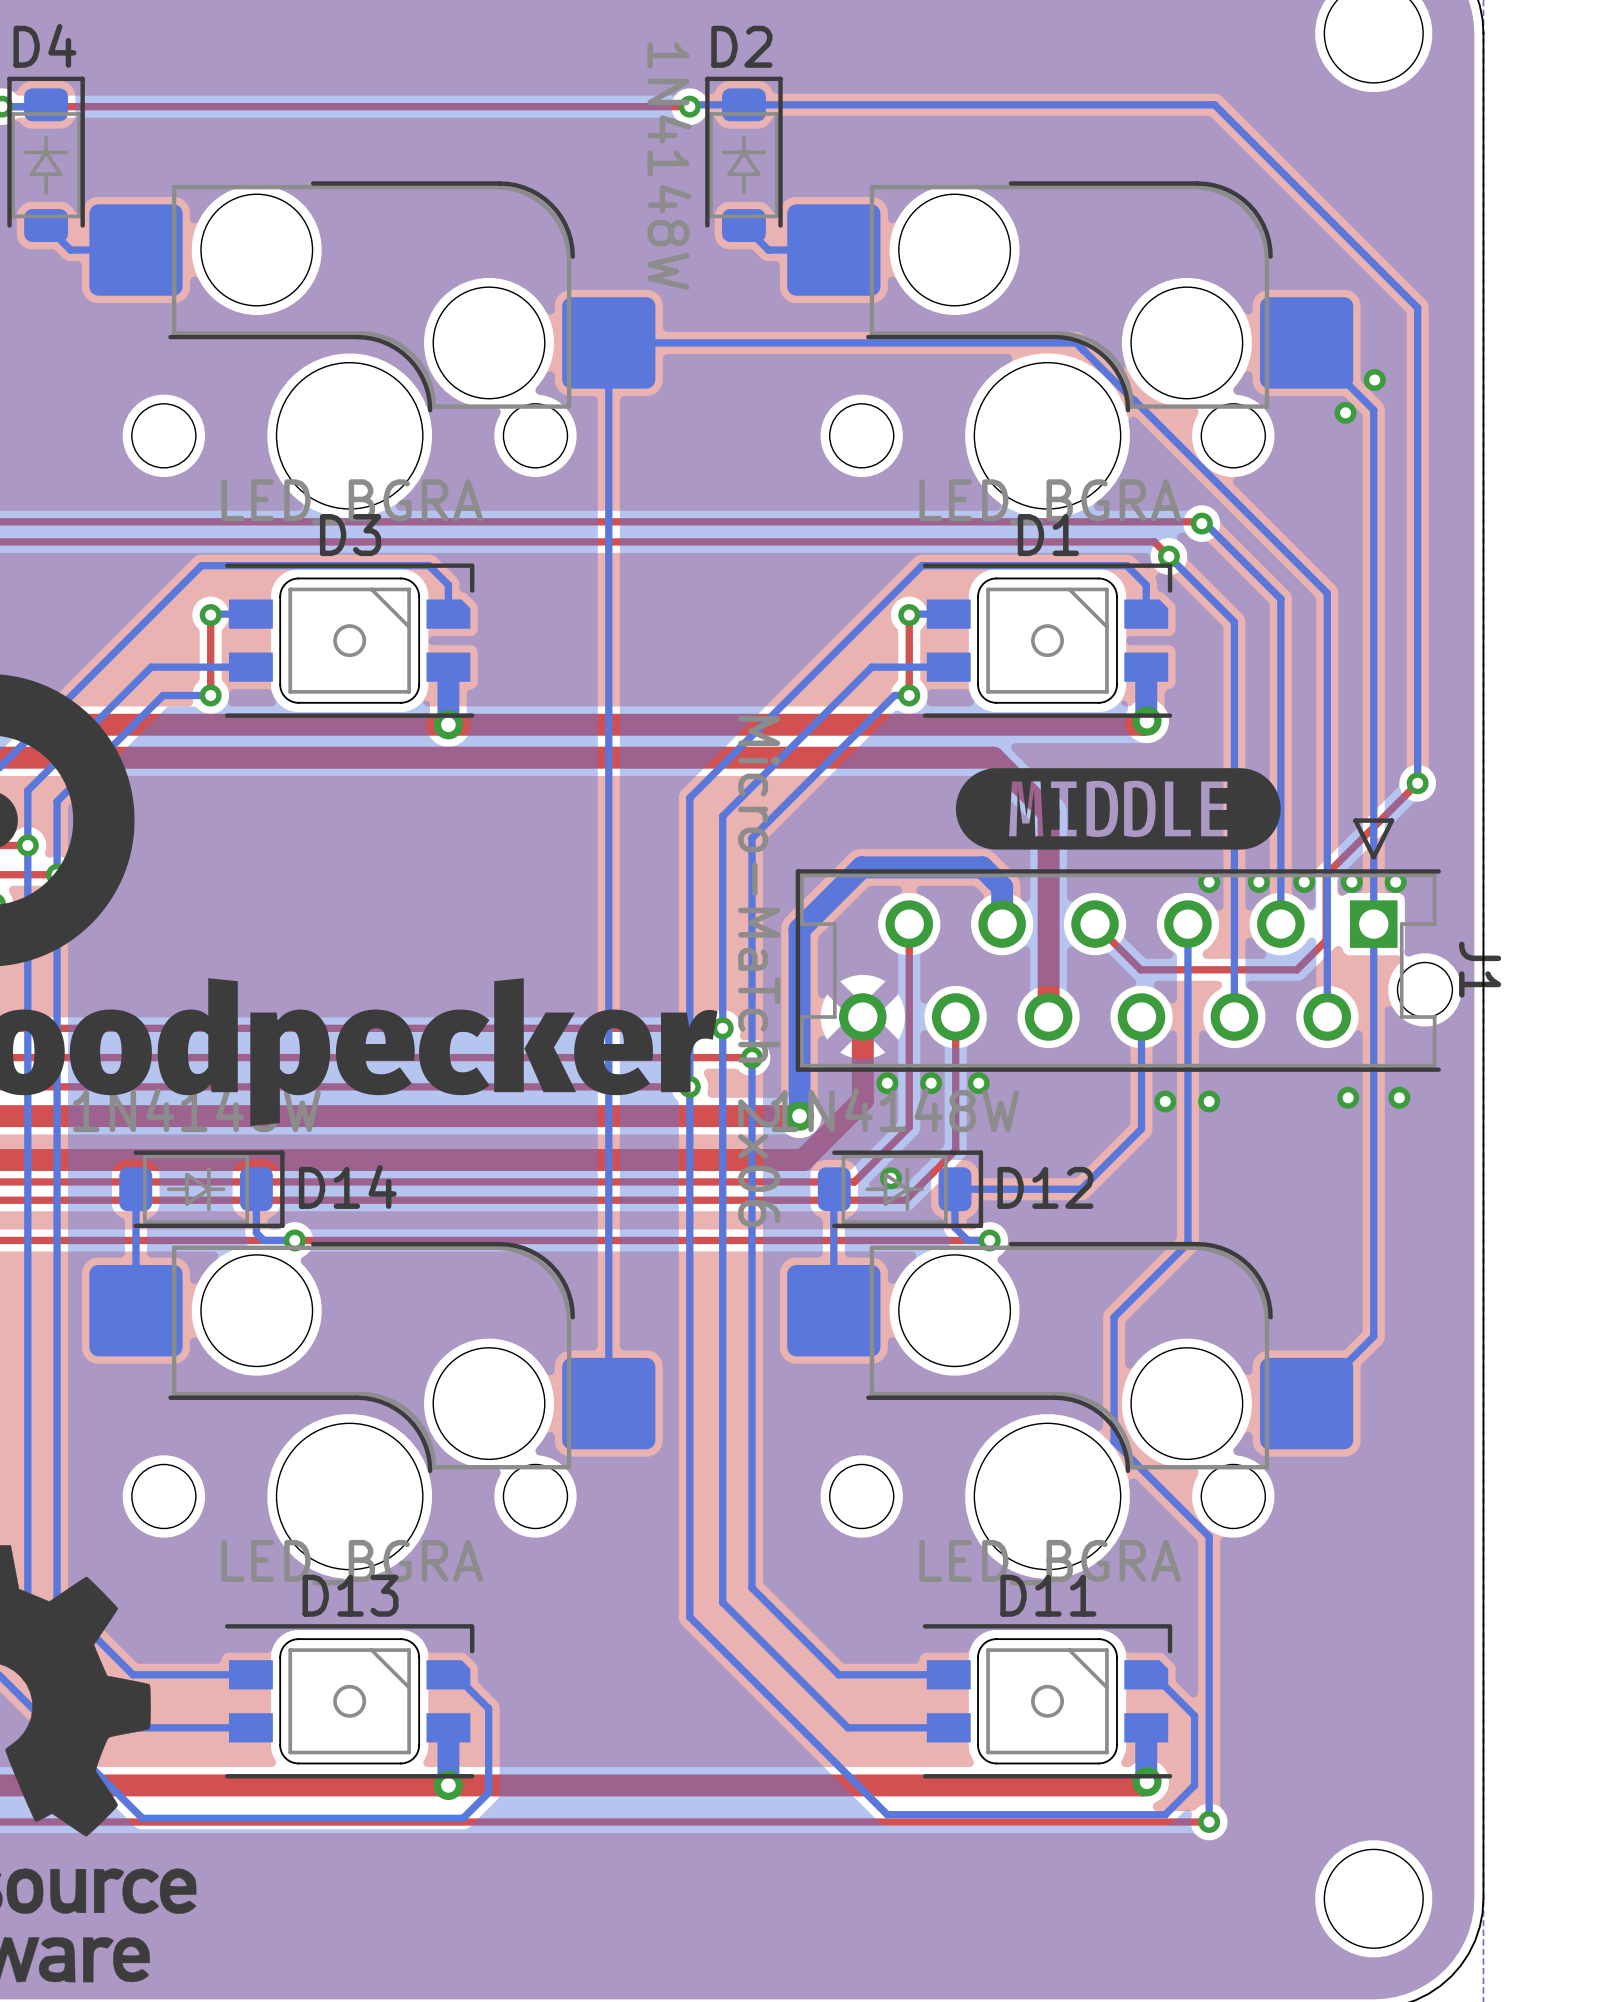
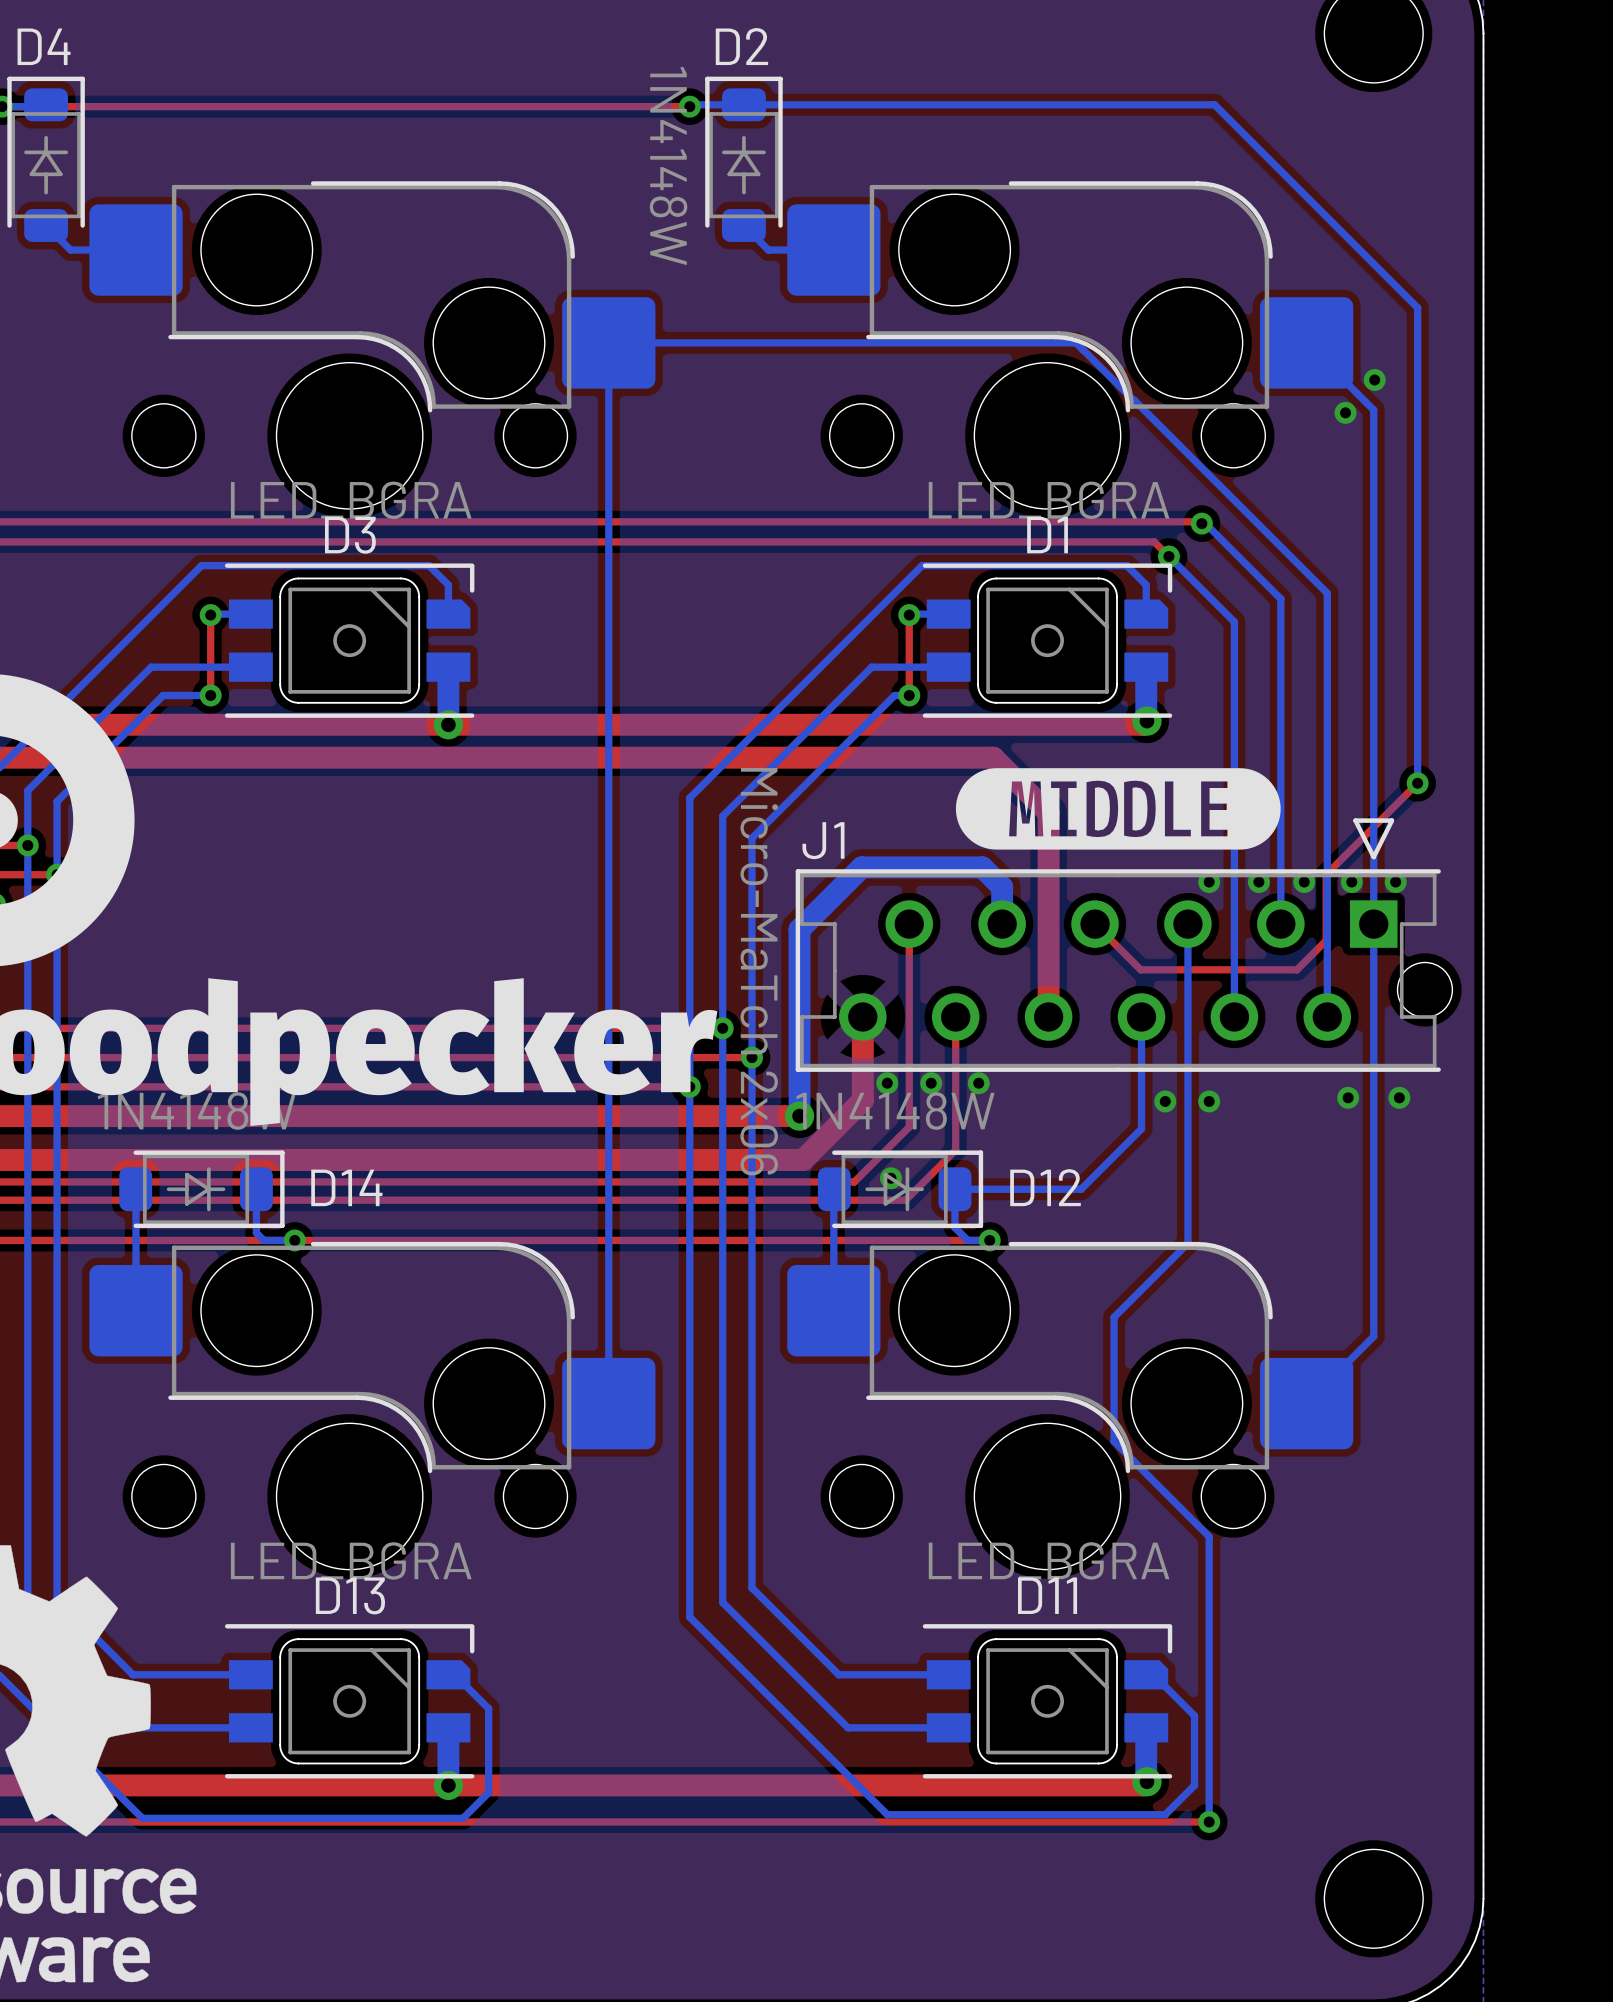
J1 name rotation: 0° (1480, 969) -> 90° counterclockwise (823, 840)
J1 name position: J1 (1480, 969) -> J1 (823, 840)

